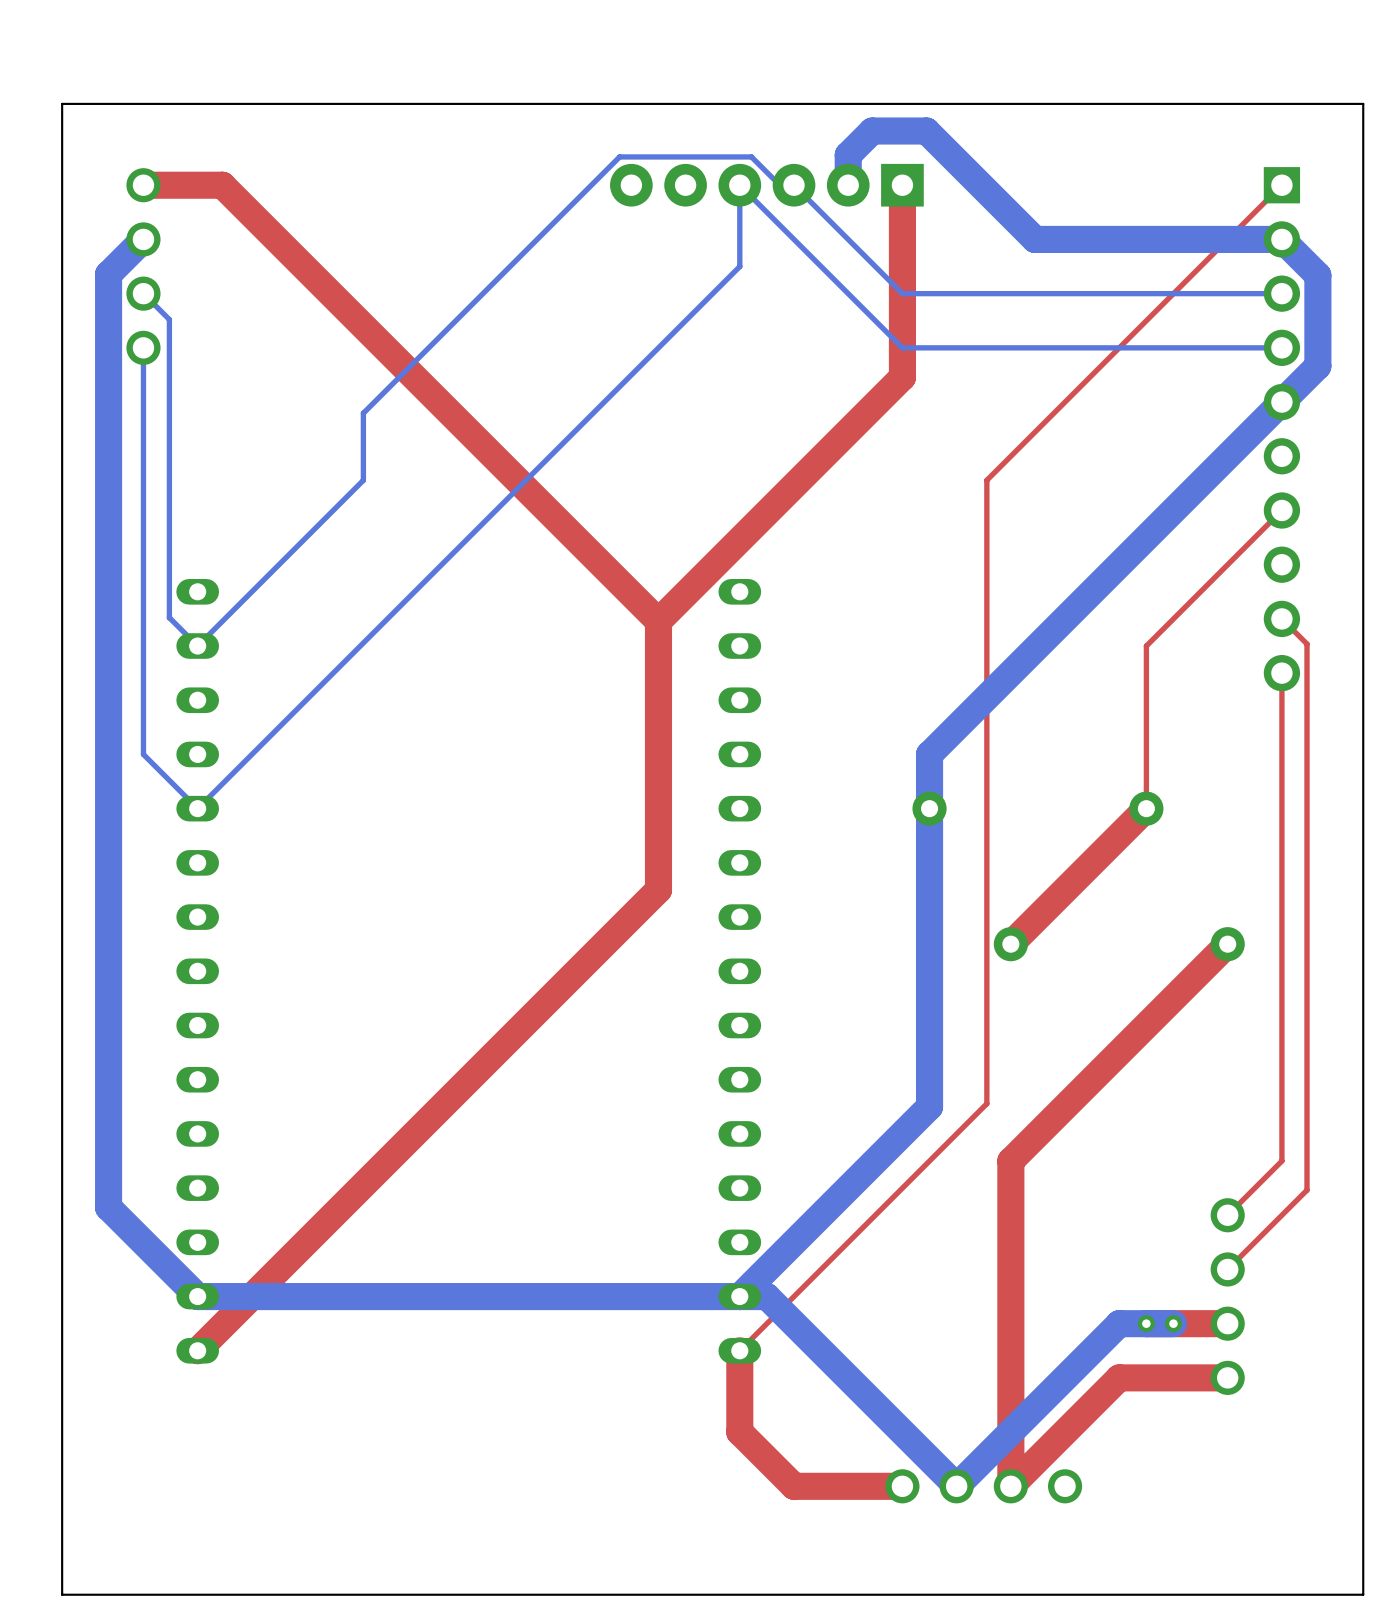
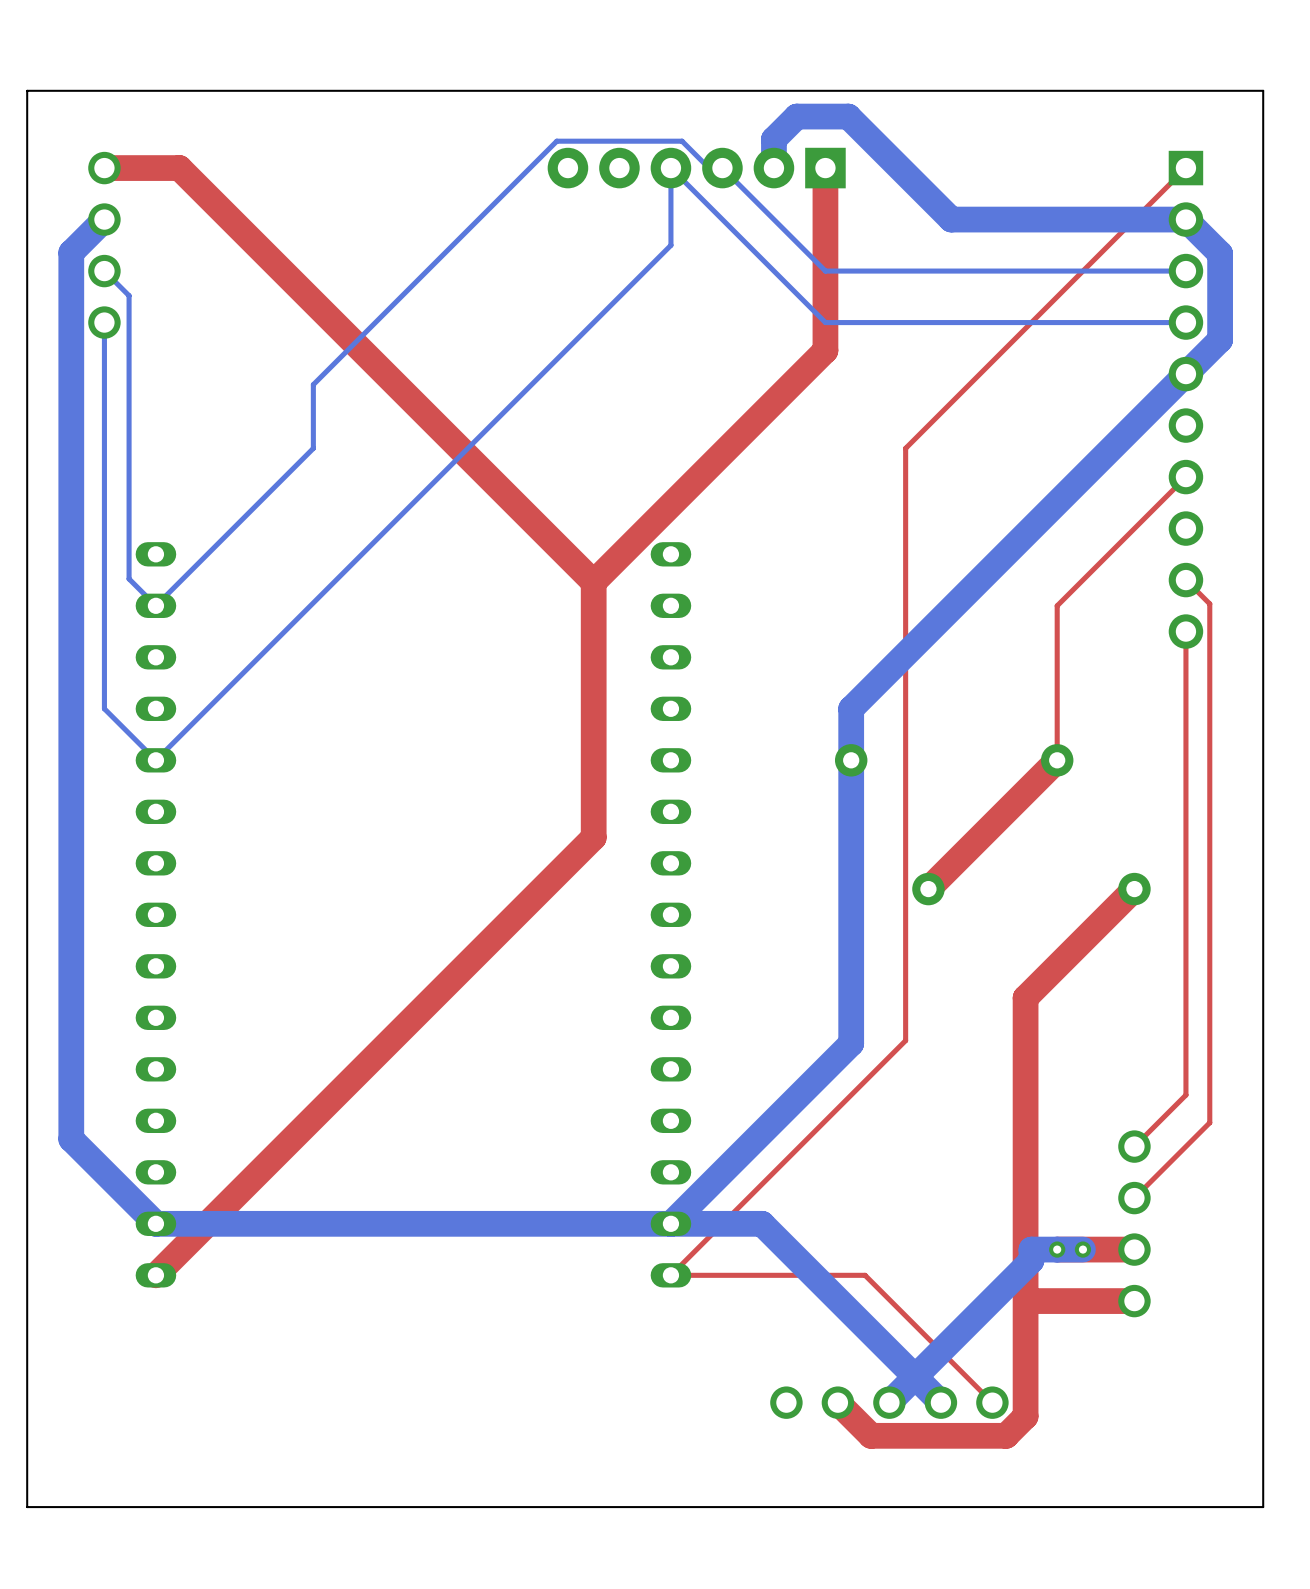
top track: (1113, 1058) (1010, 1161) (1010, 1486) (1119, 1377) -> (1025, 997) (1025, 1416) (1006, 1435) (871, 1435) (837, 1402)
bottom track: (766, 1296) (956, 1486) (1119, 1323) -> (696, 1223) (762, 1223) (940, 1402)
bottom track: none -> (1031, 1249) (1031, 1260) (889, 1402)
top track: (739, 1350) (739, 1432) (794, 1486) (902, 1486) -> (670, 1275) (865, 1275) (992, 1402)
part footprint: [885, 1469, 1083, 1504] -> [770, 1386, 1009, 1419]

